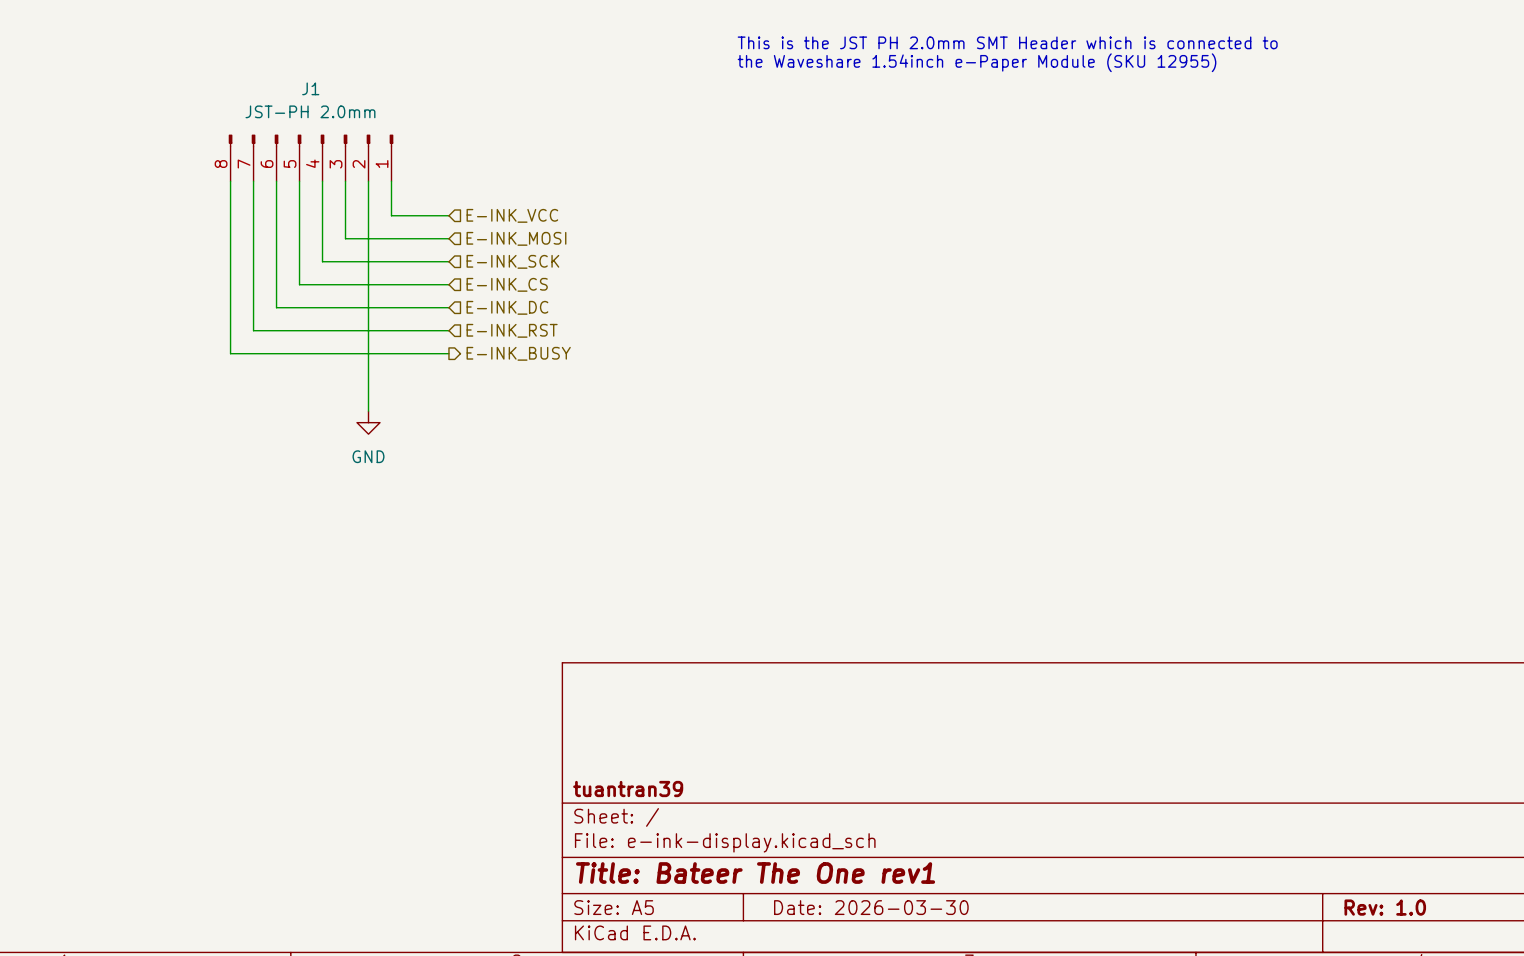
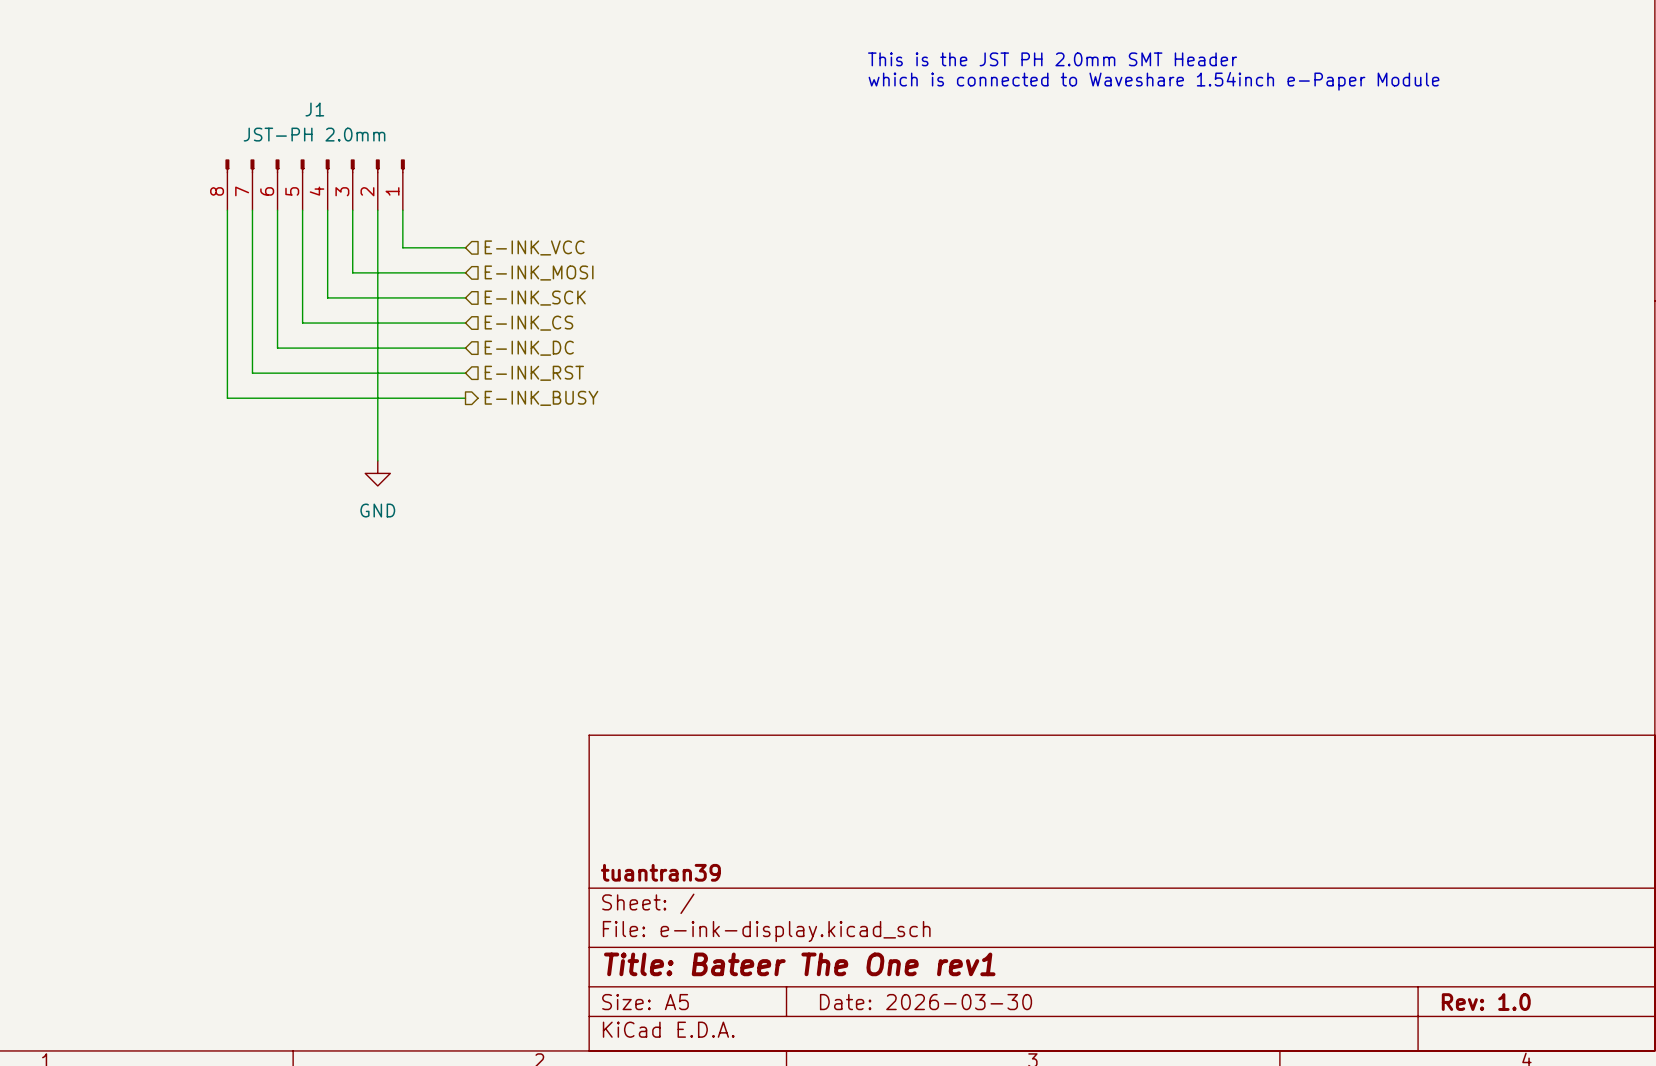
text: This is the JST PH 2.0mm SMT Header which is connected to (1007, 42) -> This is the JST PH 2.0mm SMT Header (1052, 59)
text: the Waveshare 1.54inch e-Paper Module (SKU 12955) (977, 62) -> which is connected to Waveshare 1.54inch e-Paper Module (1153, 81)

